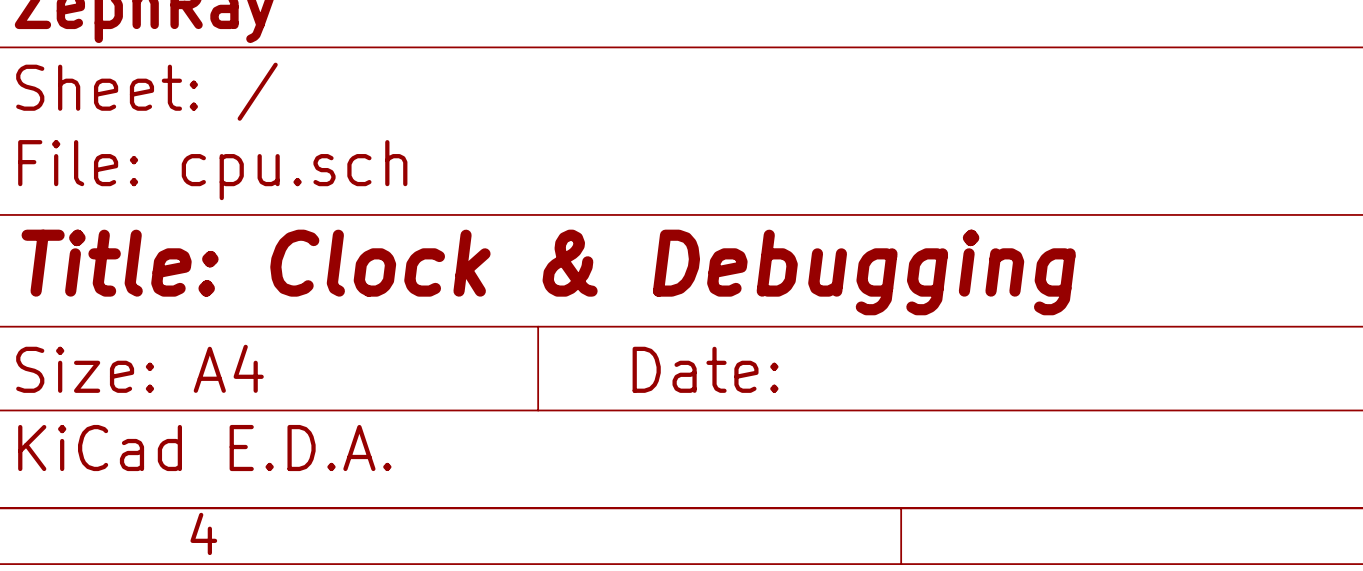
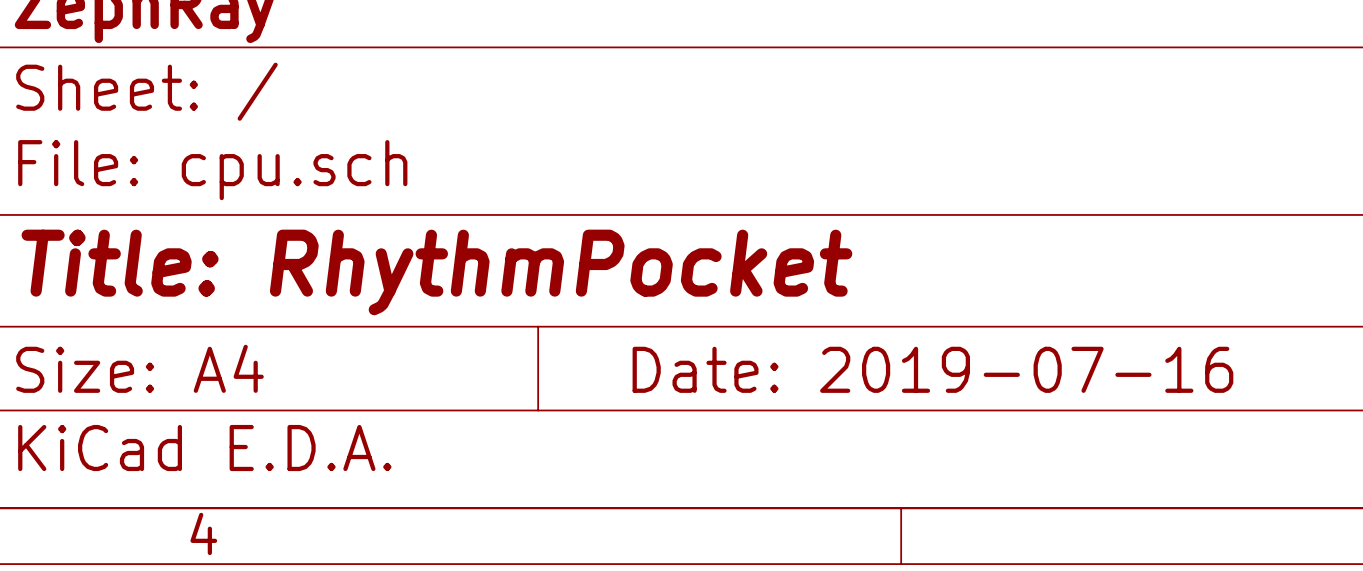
title block: Title: Clock & Debugging (548, 272) -> Title: RhythmPocket (436, 272)
title block: Date: (705, 369) -> Date: 2019-07-16 (932, 369)

